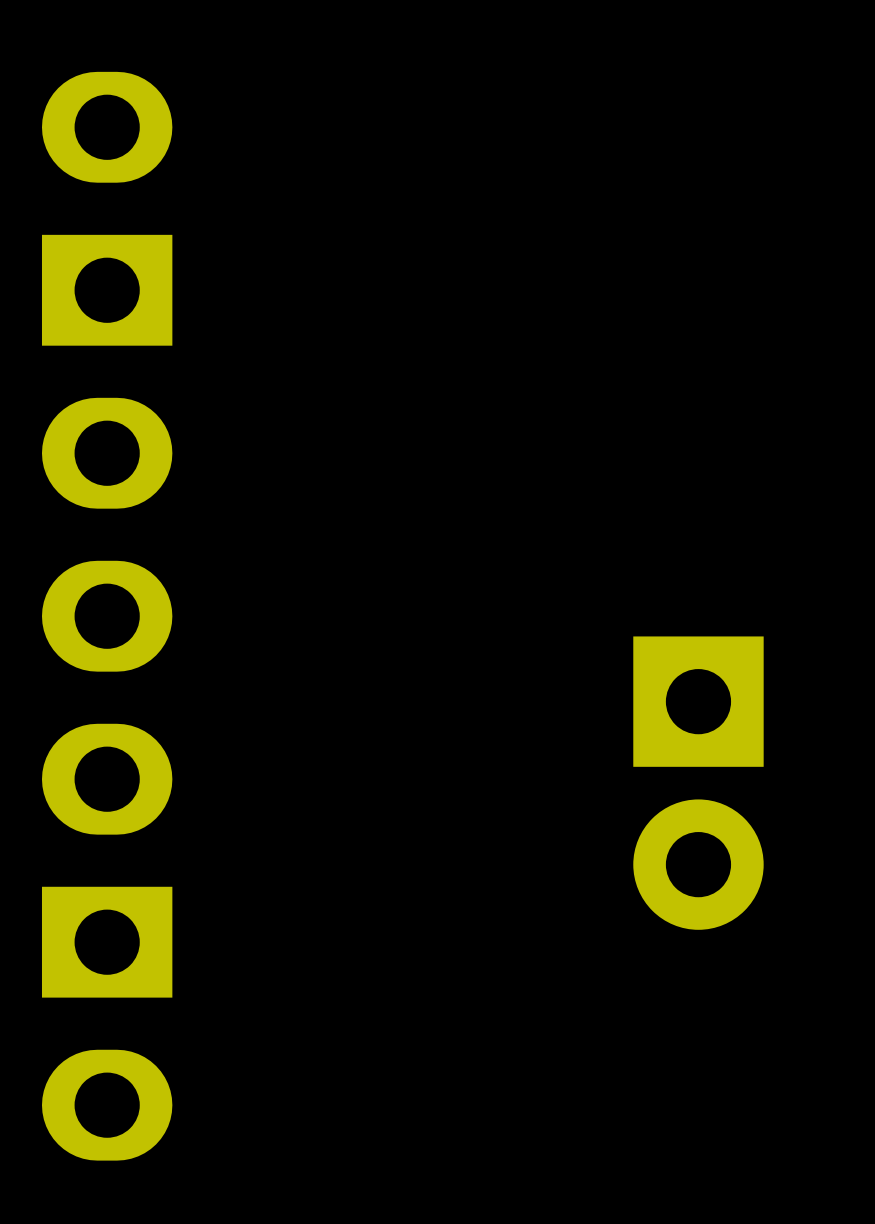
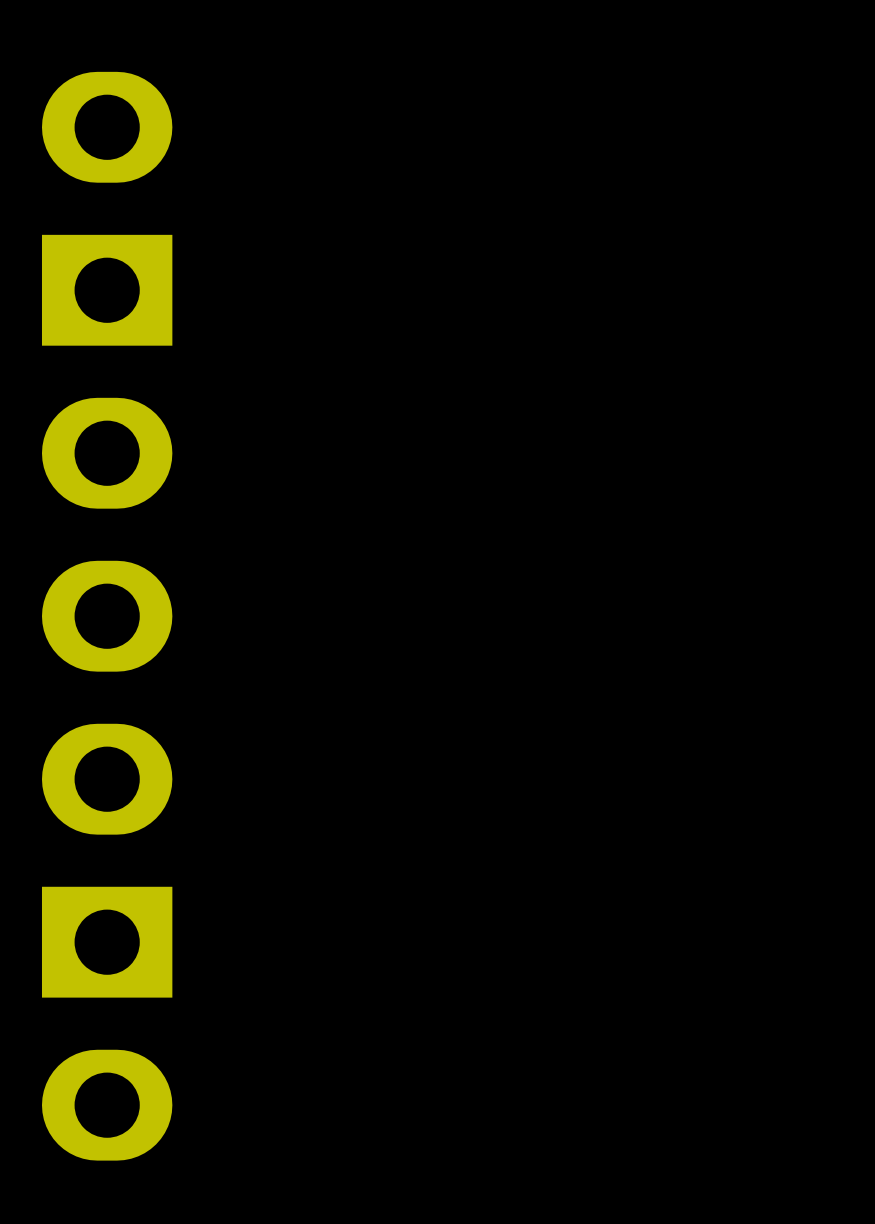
part: (698, 783) -> none

